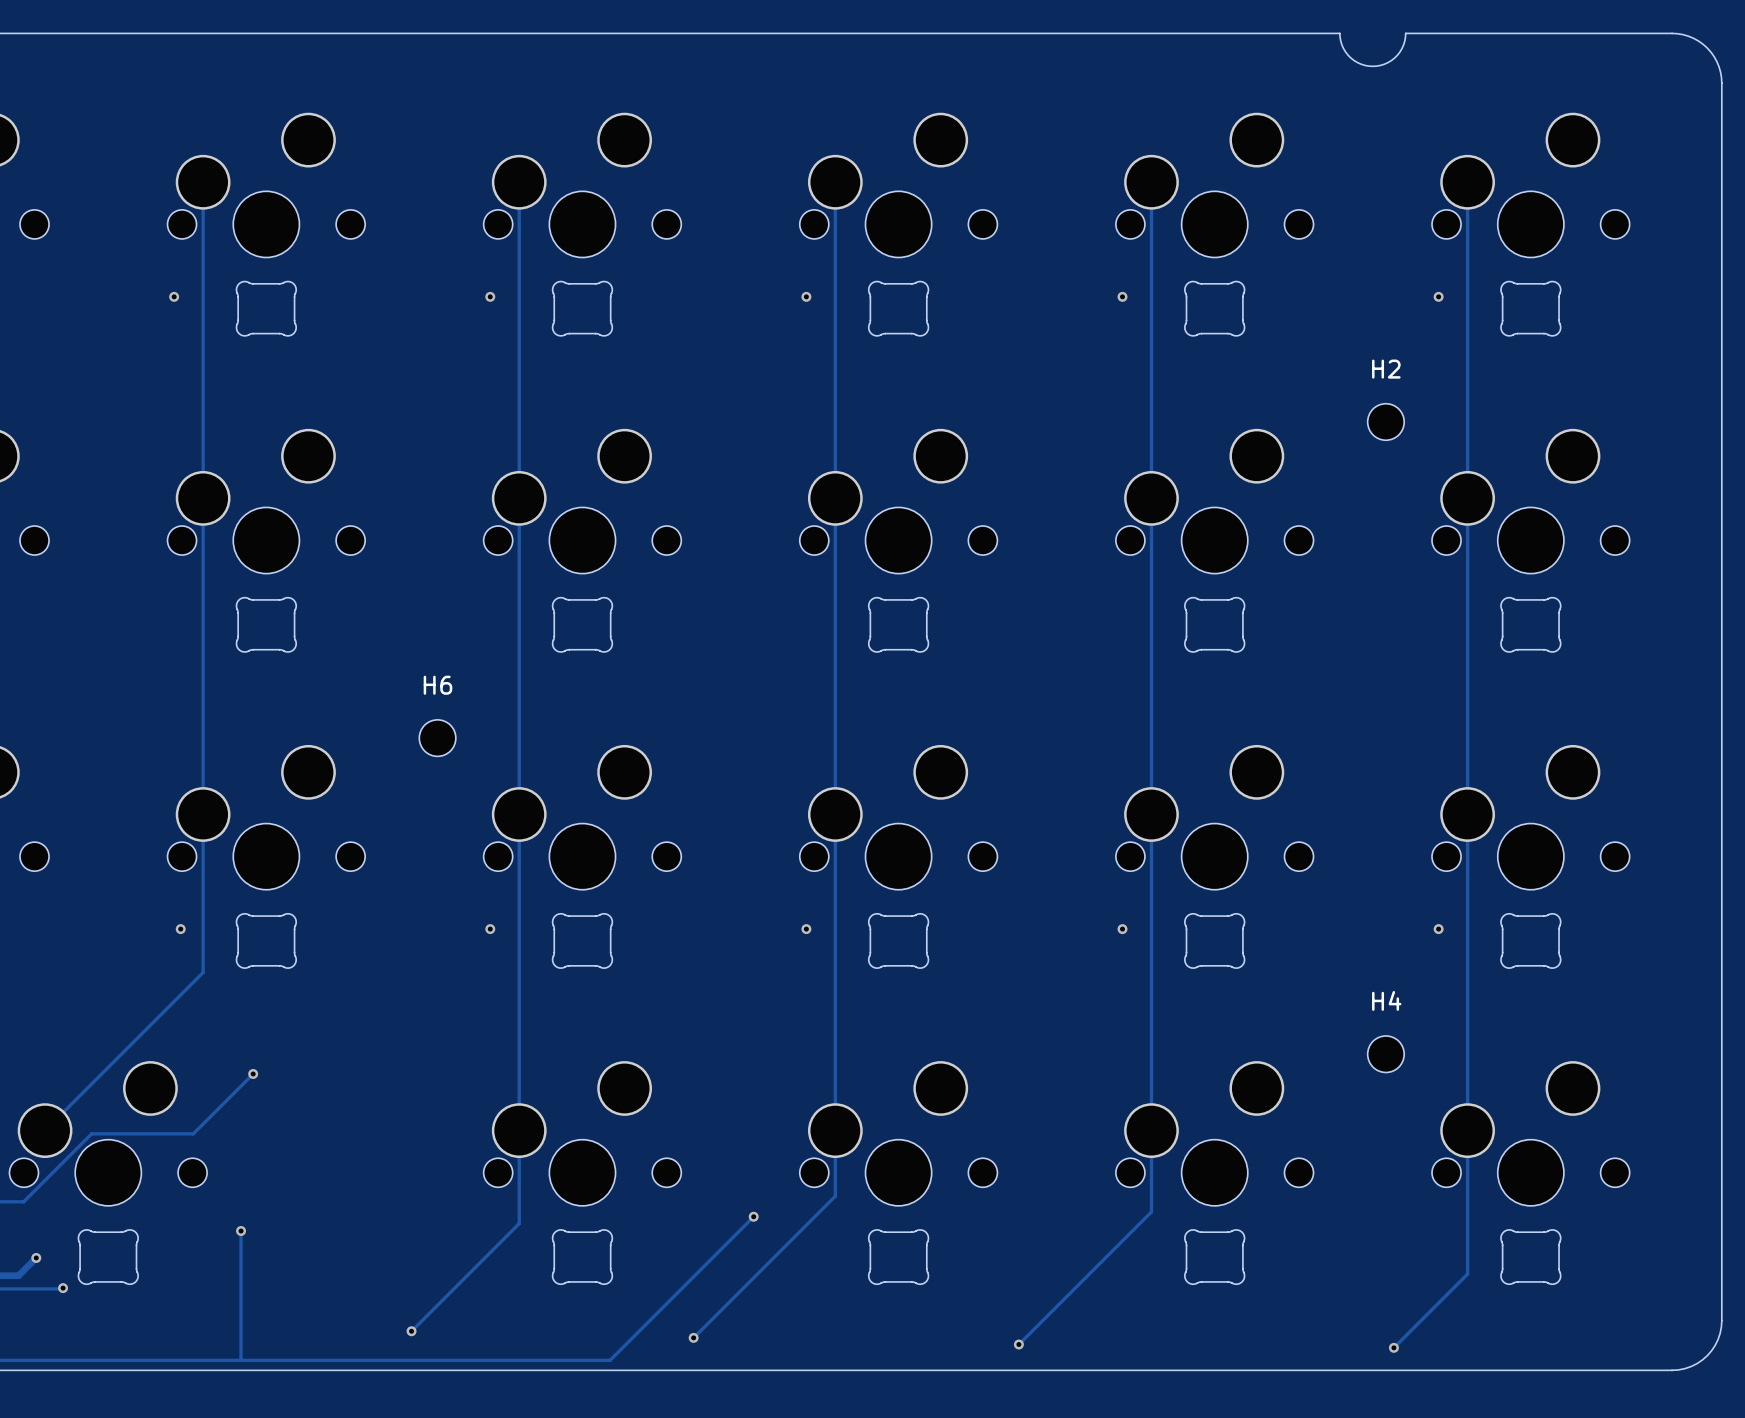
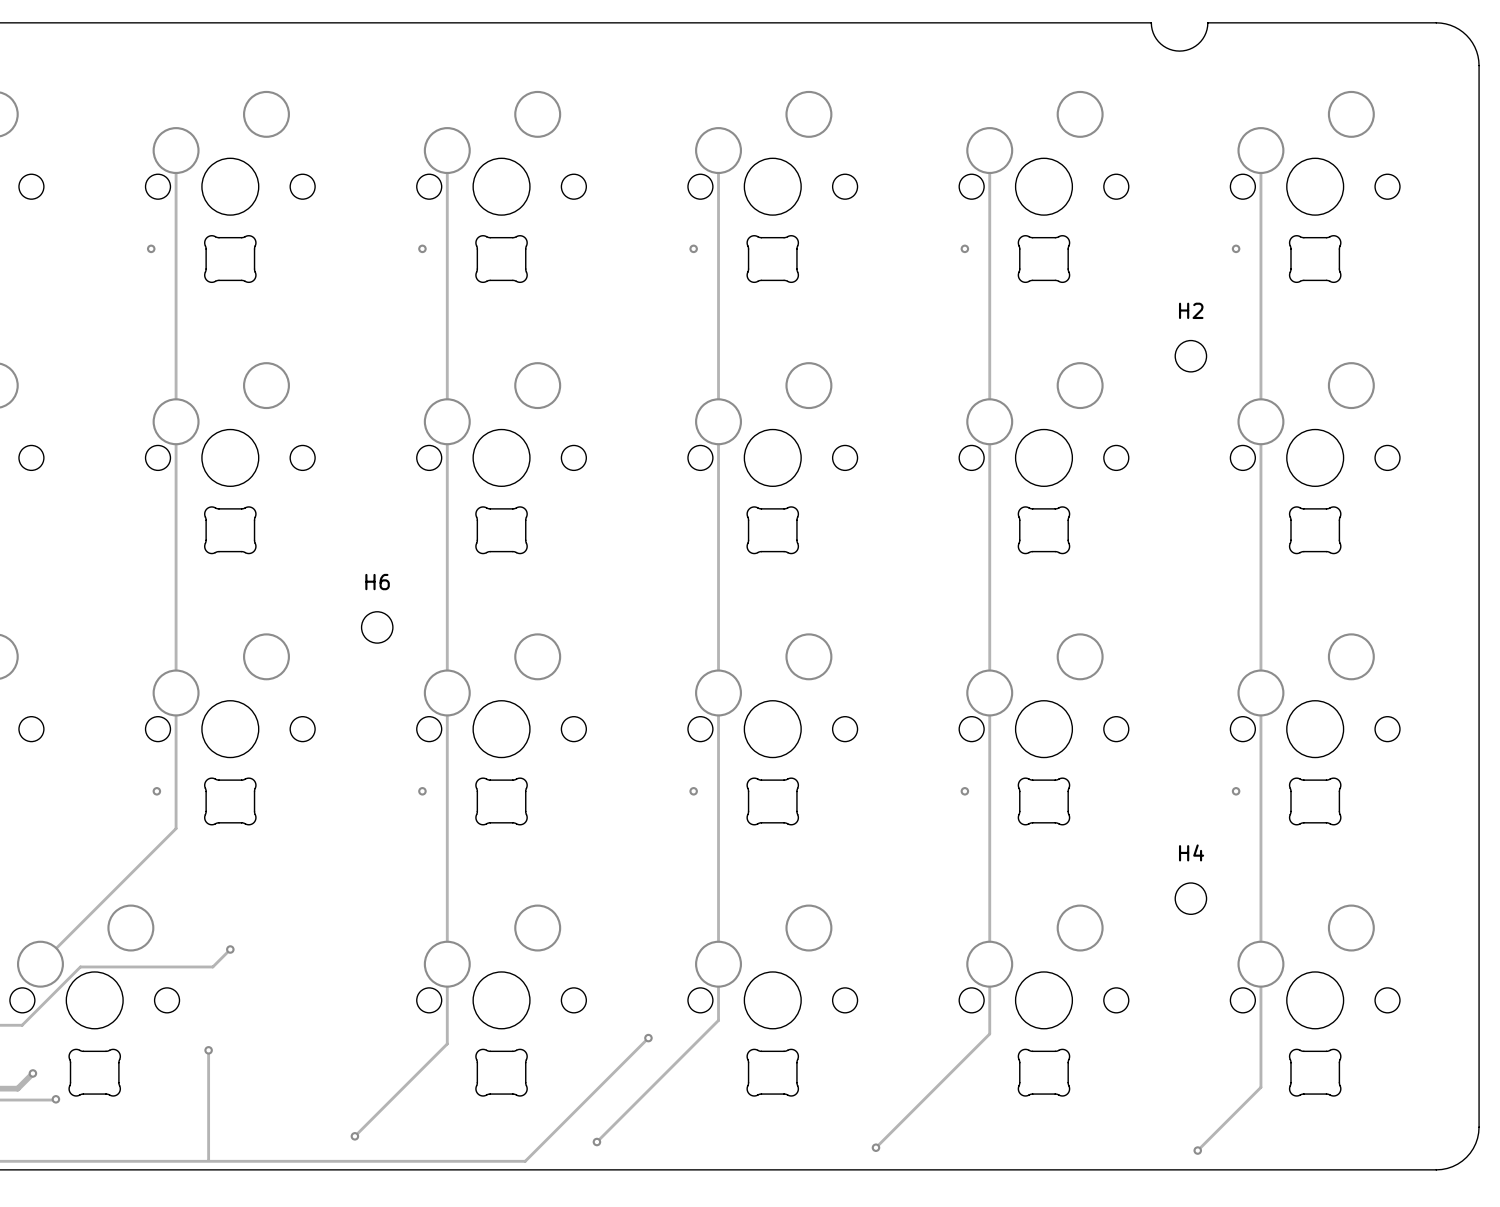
track: (253, 1073) (193, 1133) -> (230, 949) (212, 966) (167, 966)
via position: (253, 1073) -> (230, 949)

